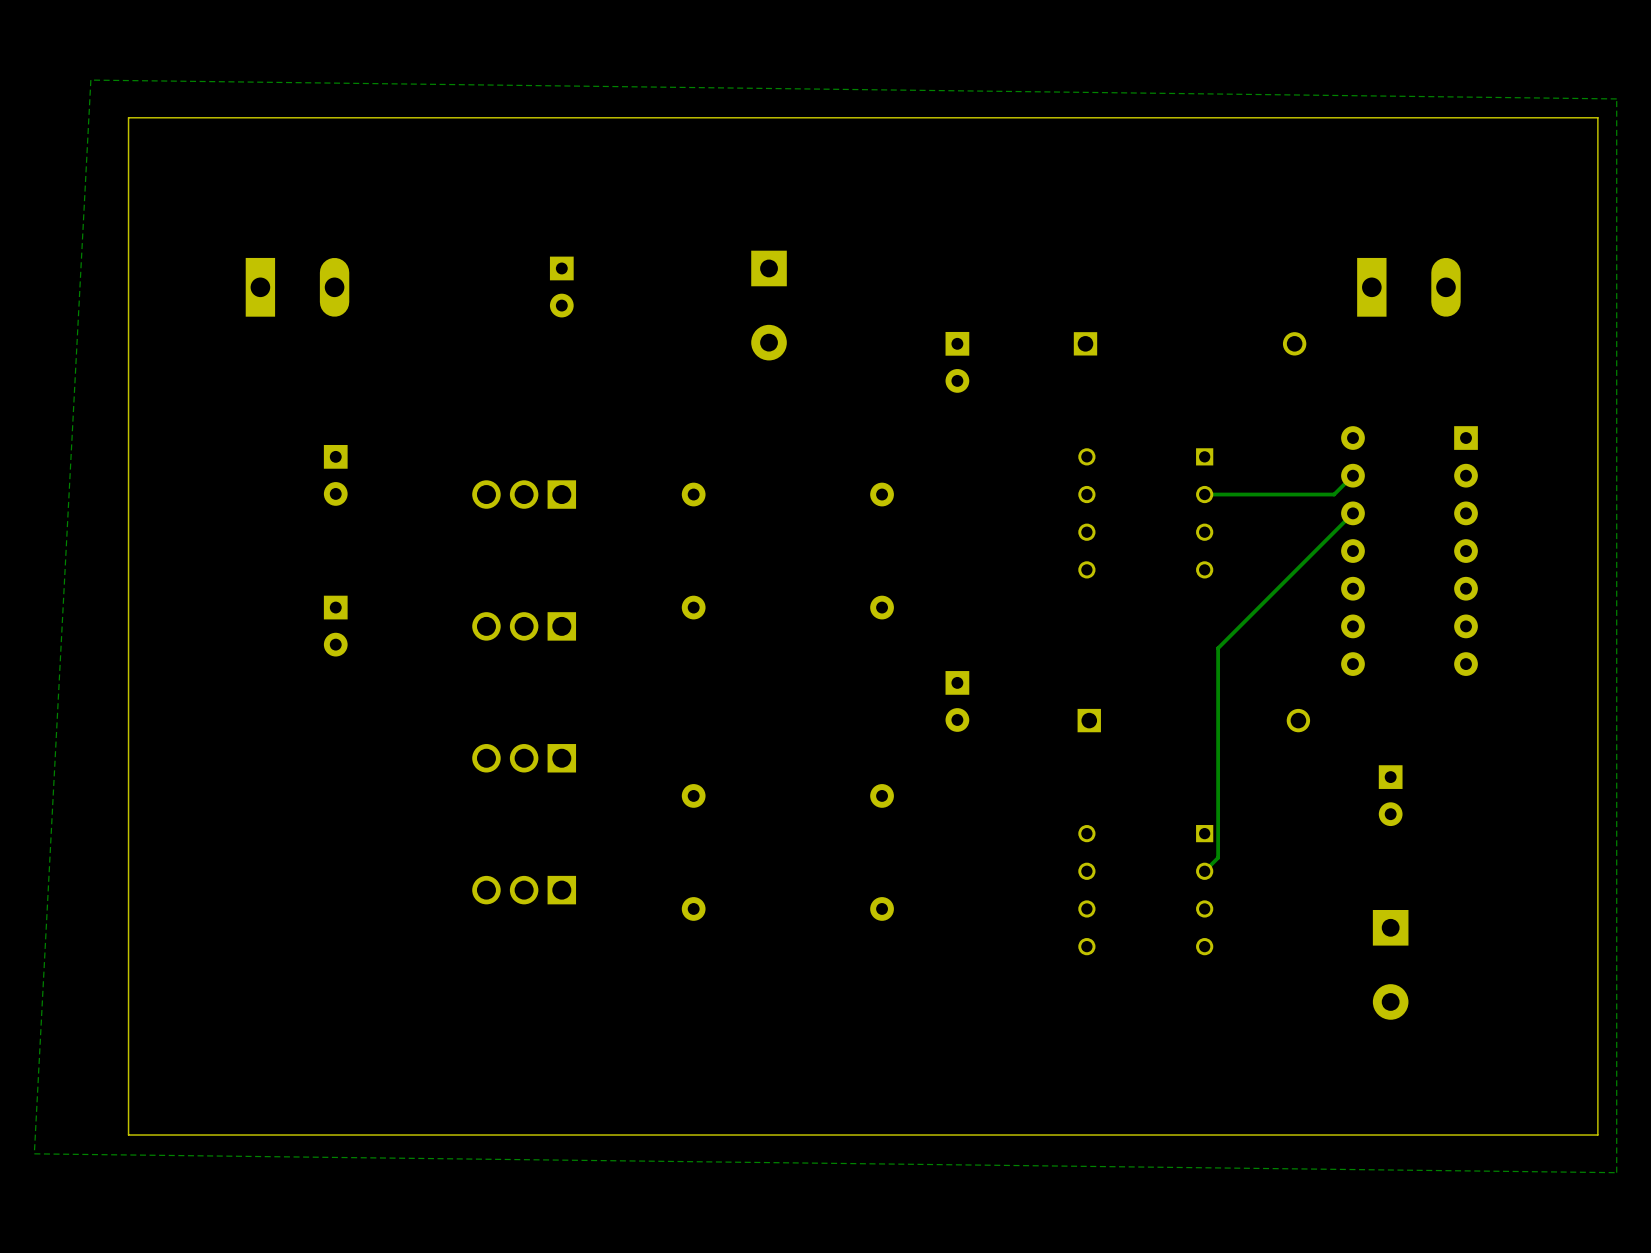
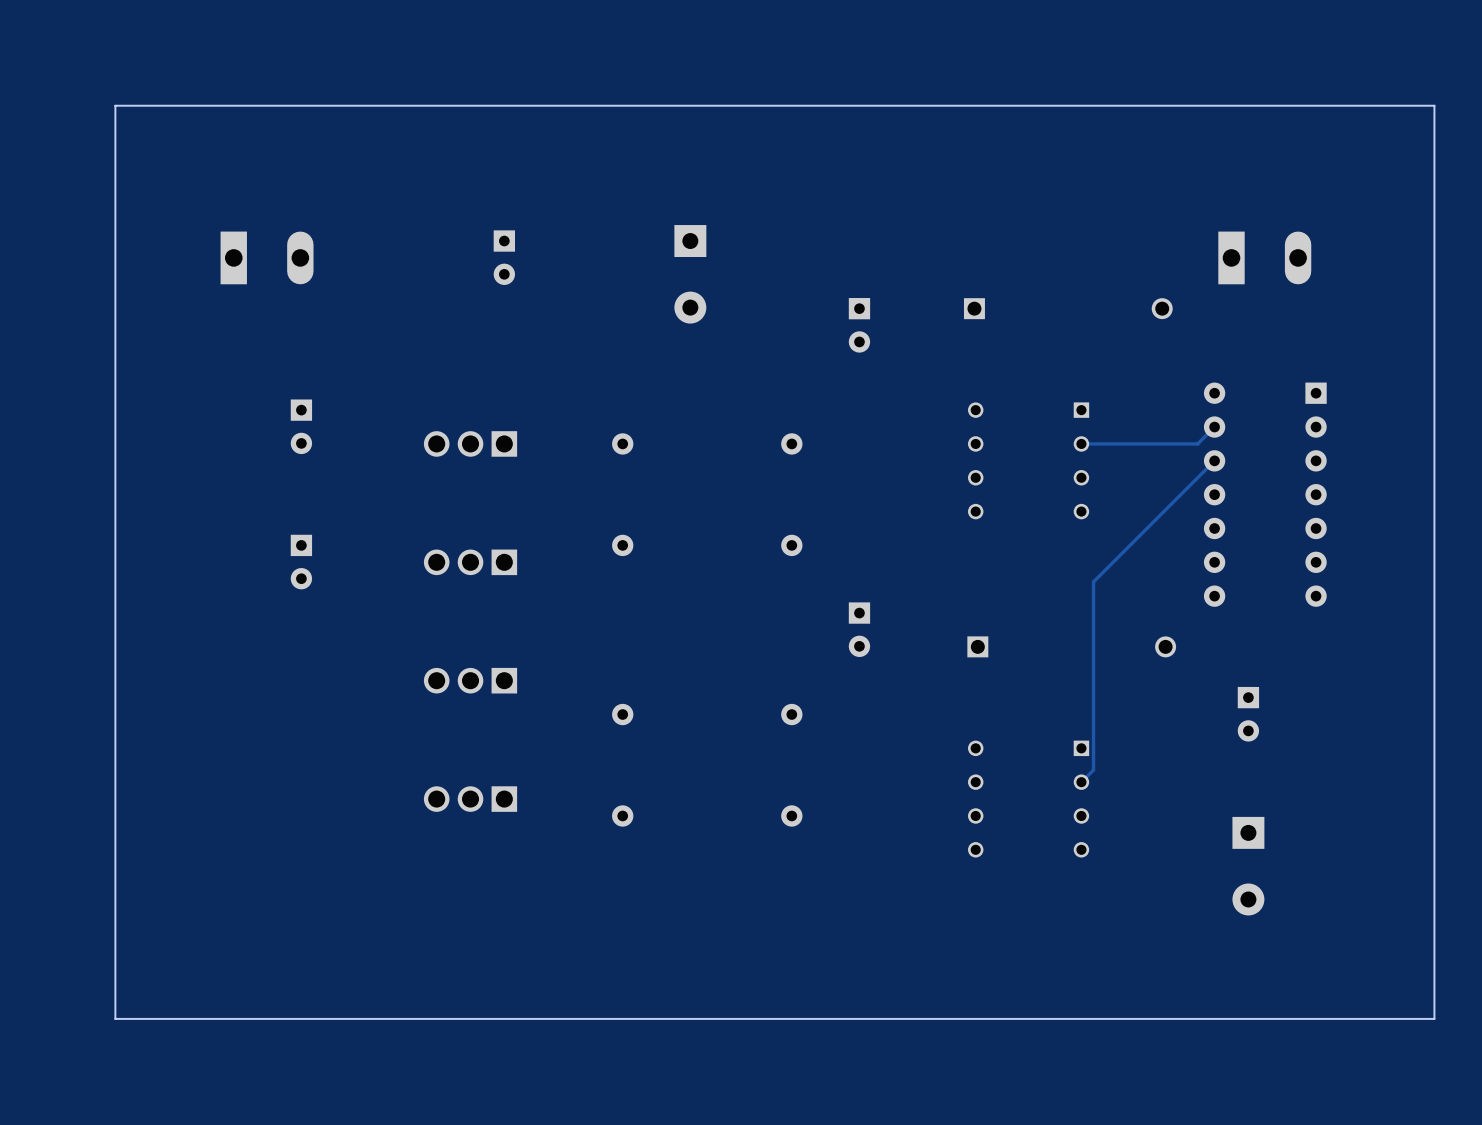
zone outline: (90, 80) (1616, 98) (1616, 1172) (34, 1153) (90, 80) -> none

